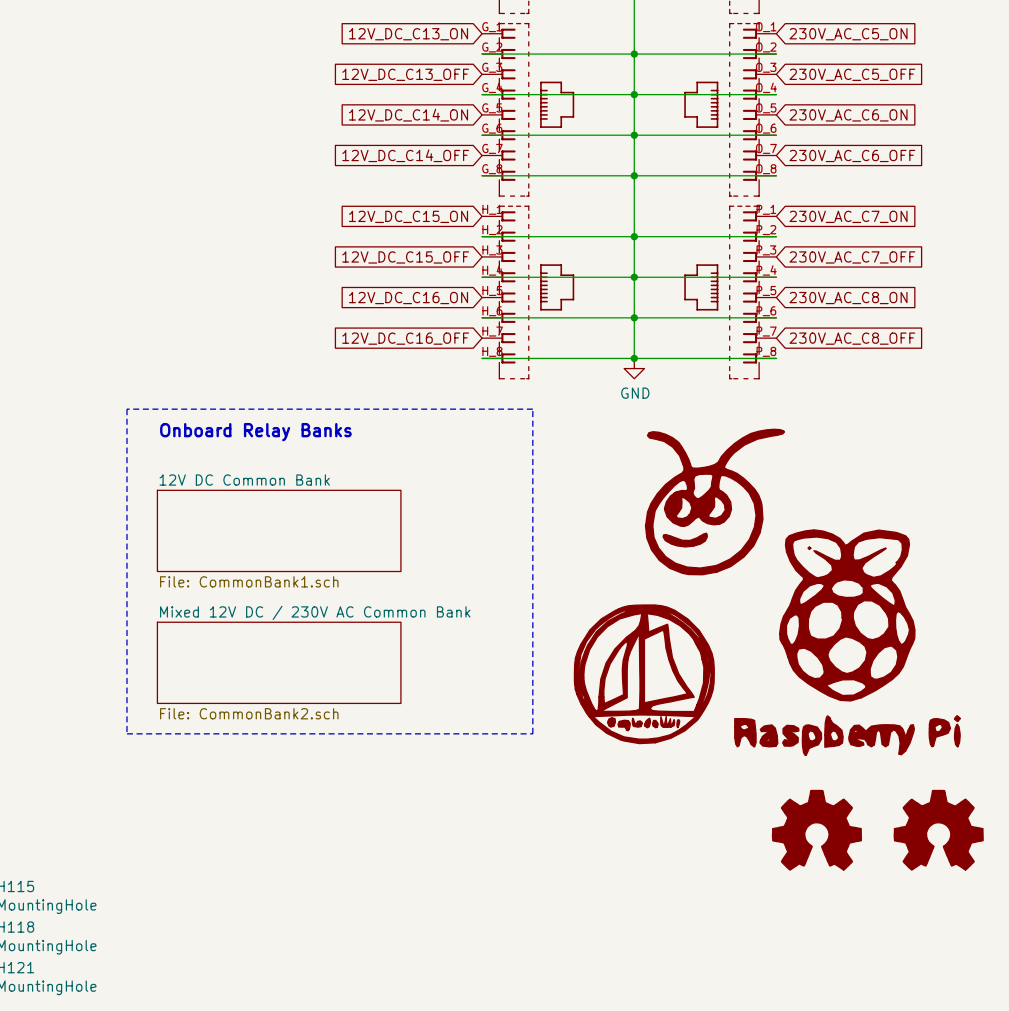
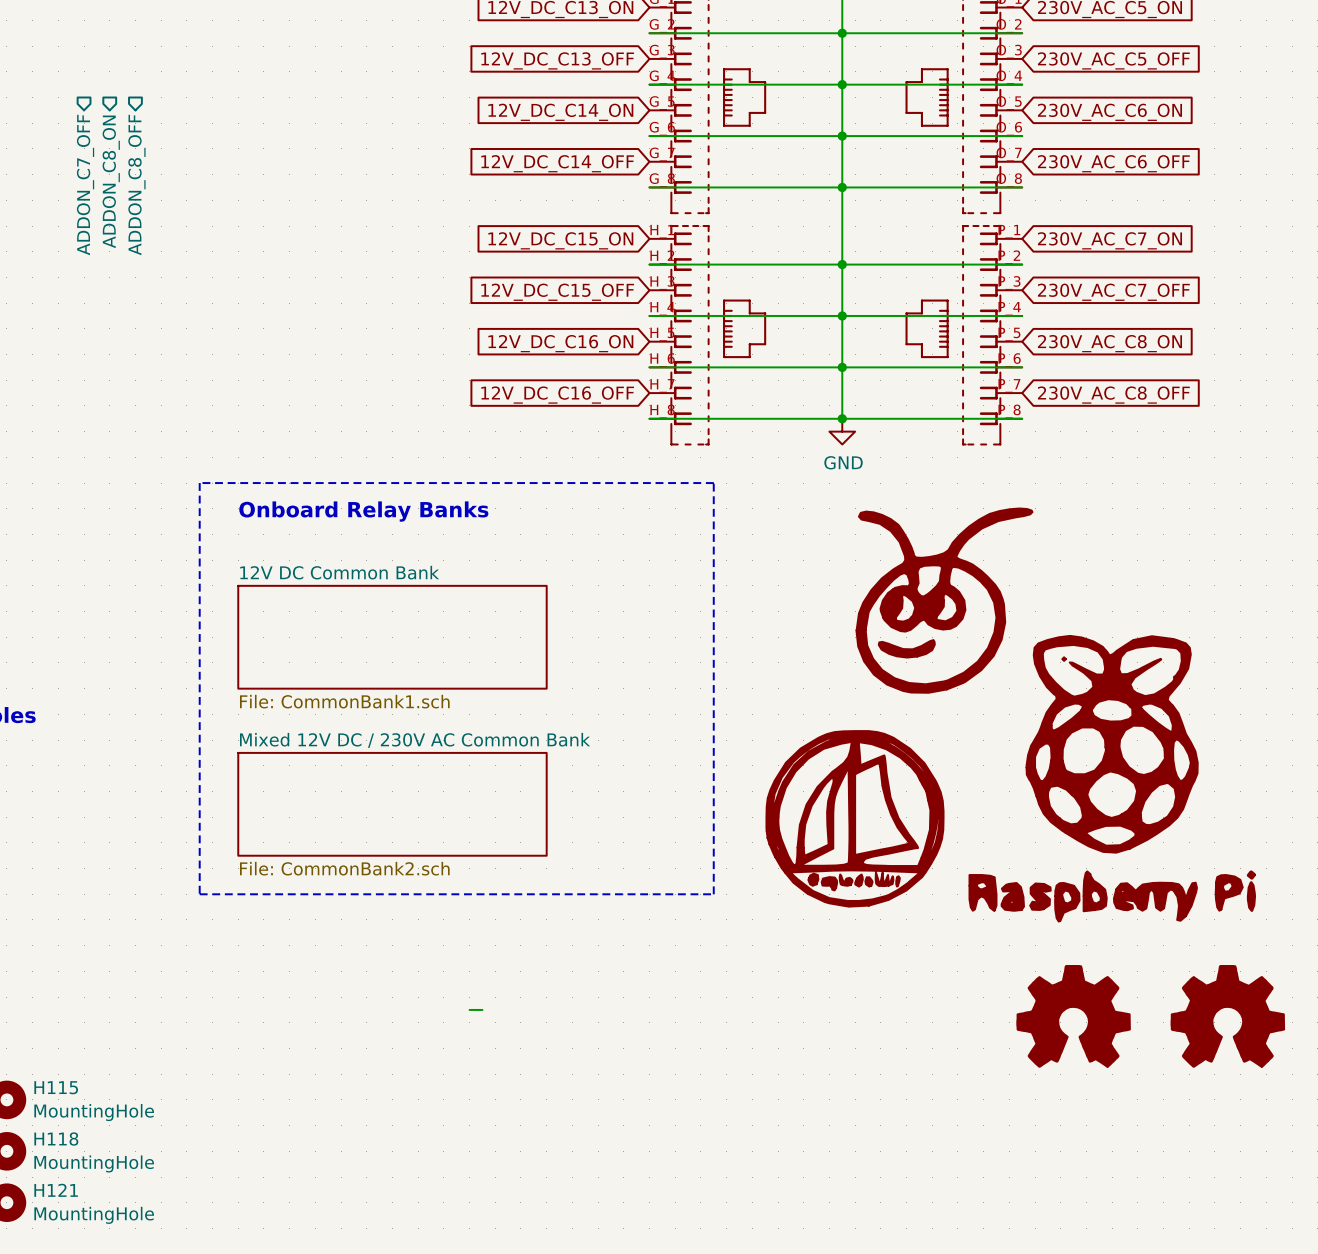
sheet pin: none -> ADDON_C8_ON (111, 181)
sheet pin: none -> ADDON_C7_OFF (85, 185)
sheet pin: none -> ADDON_C8_OFF (136, 185)
wire: none -> (469, 1009) (482, 1009)

